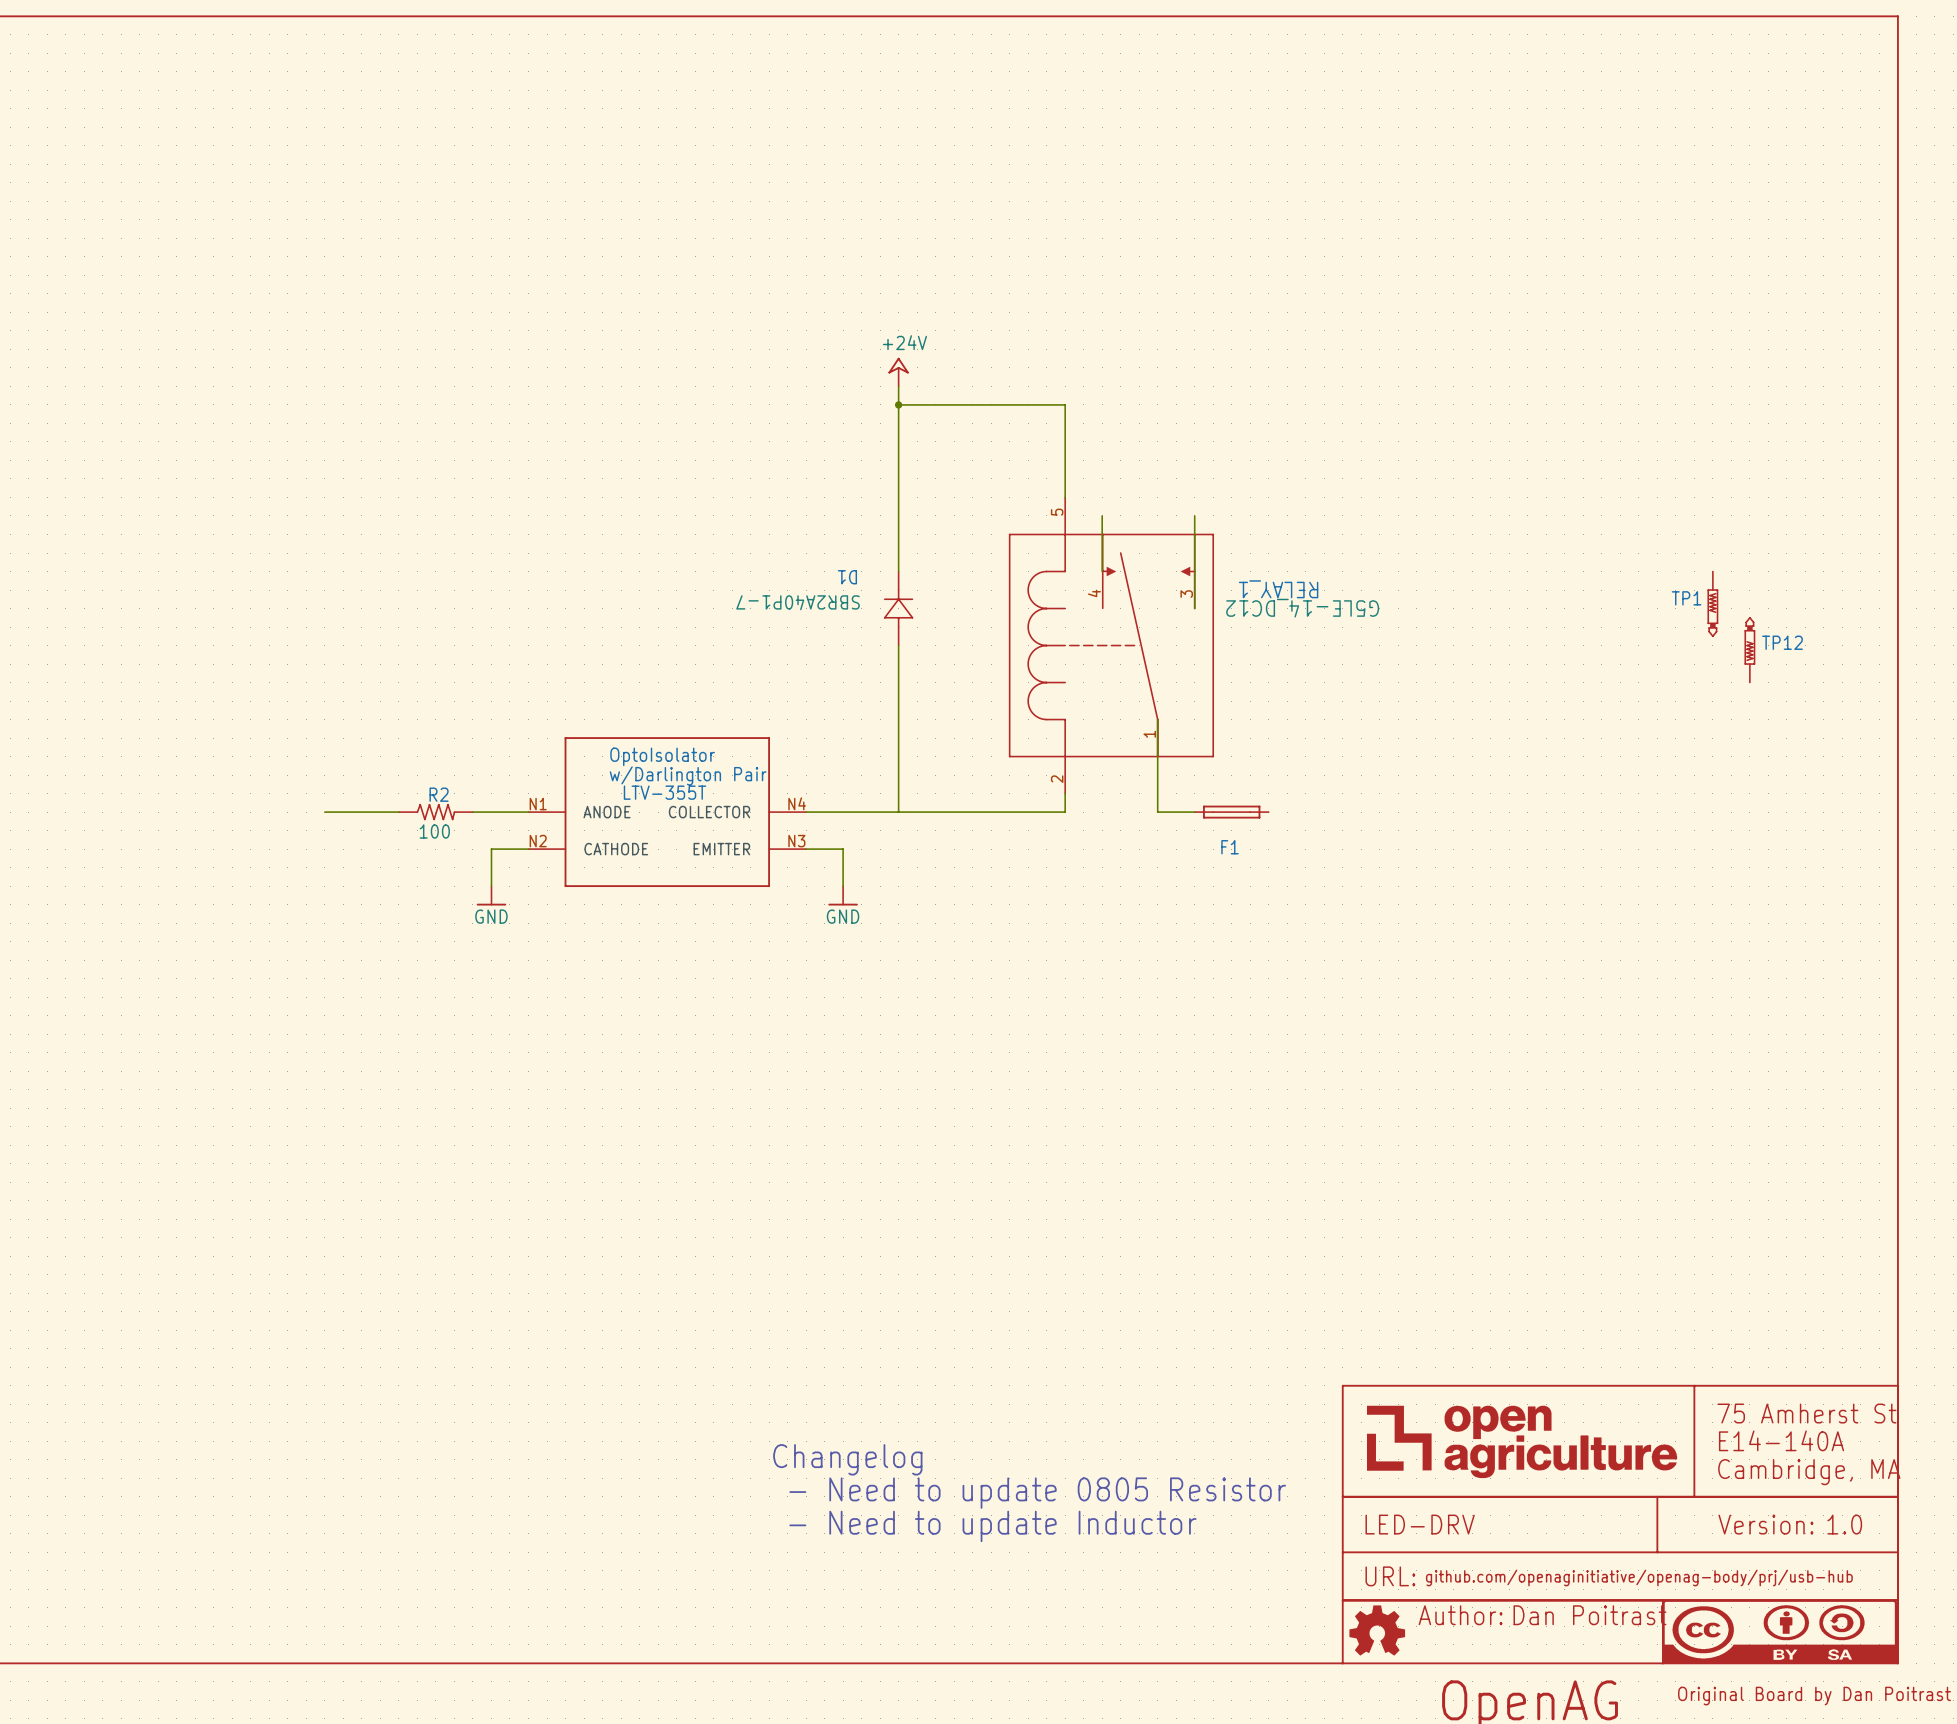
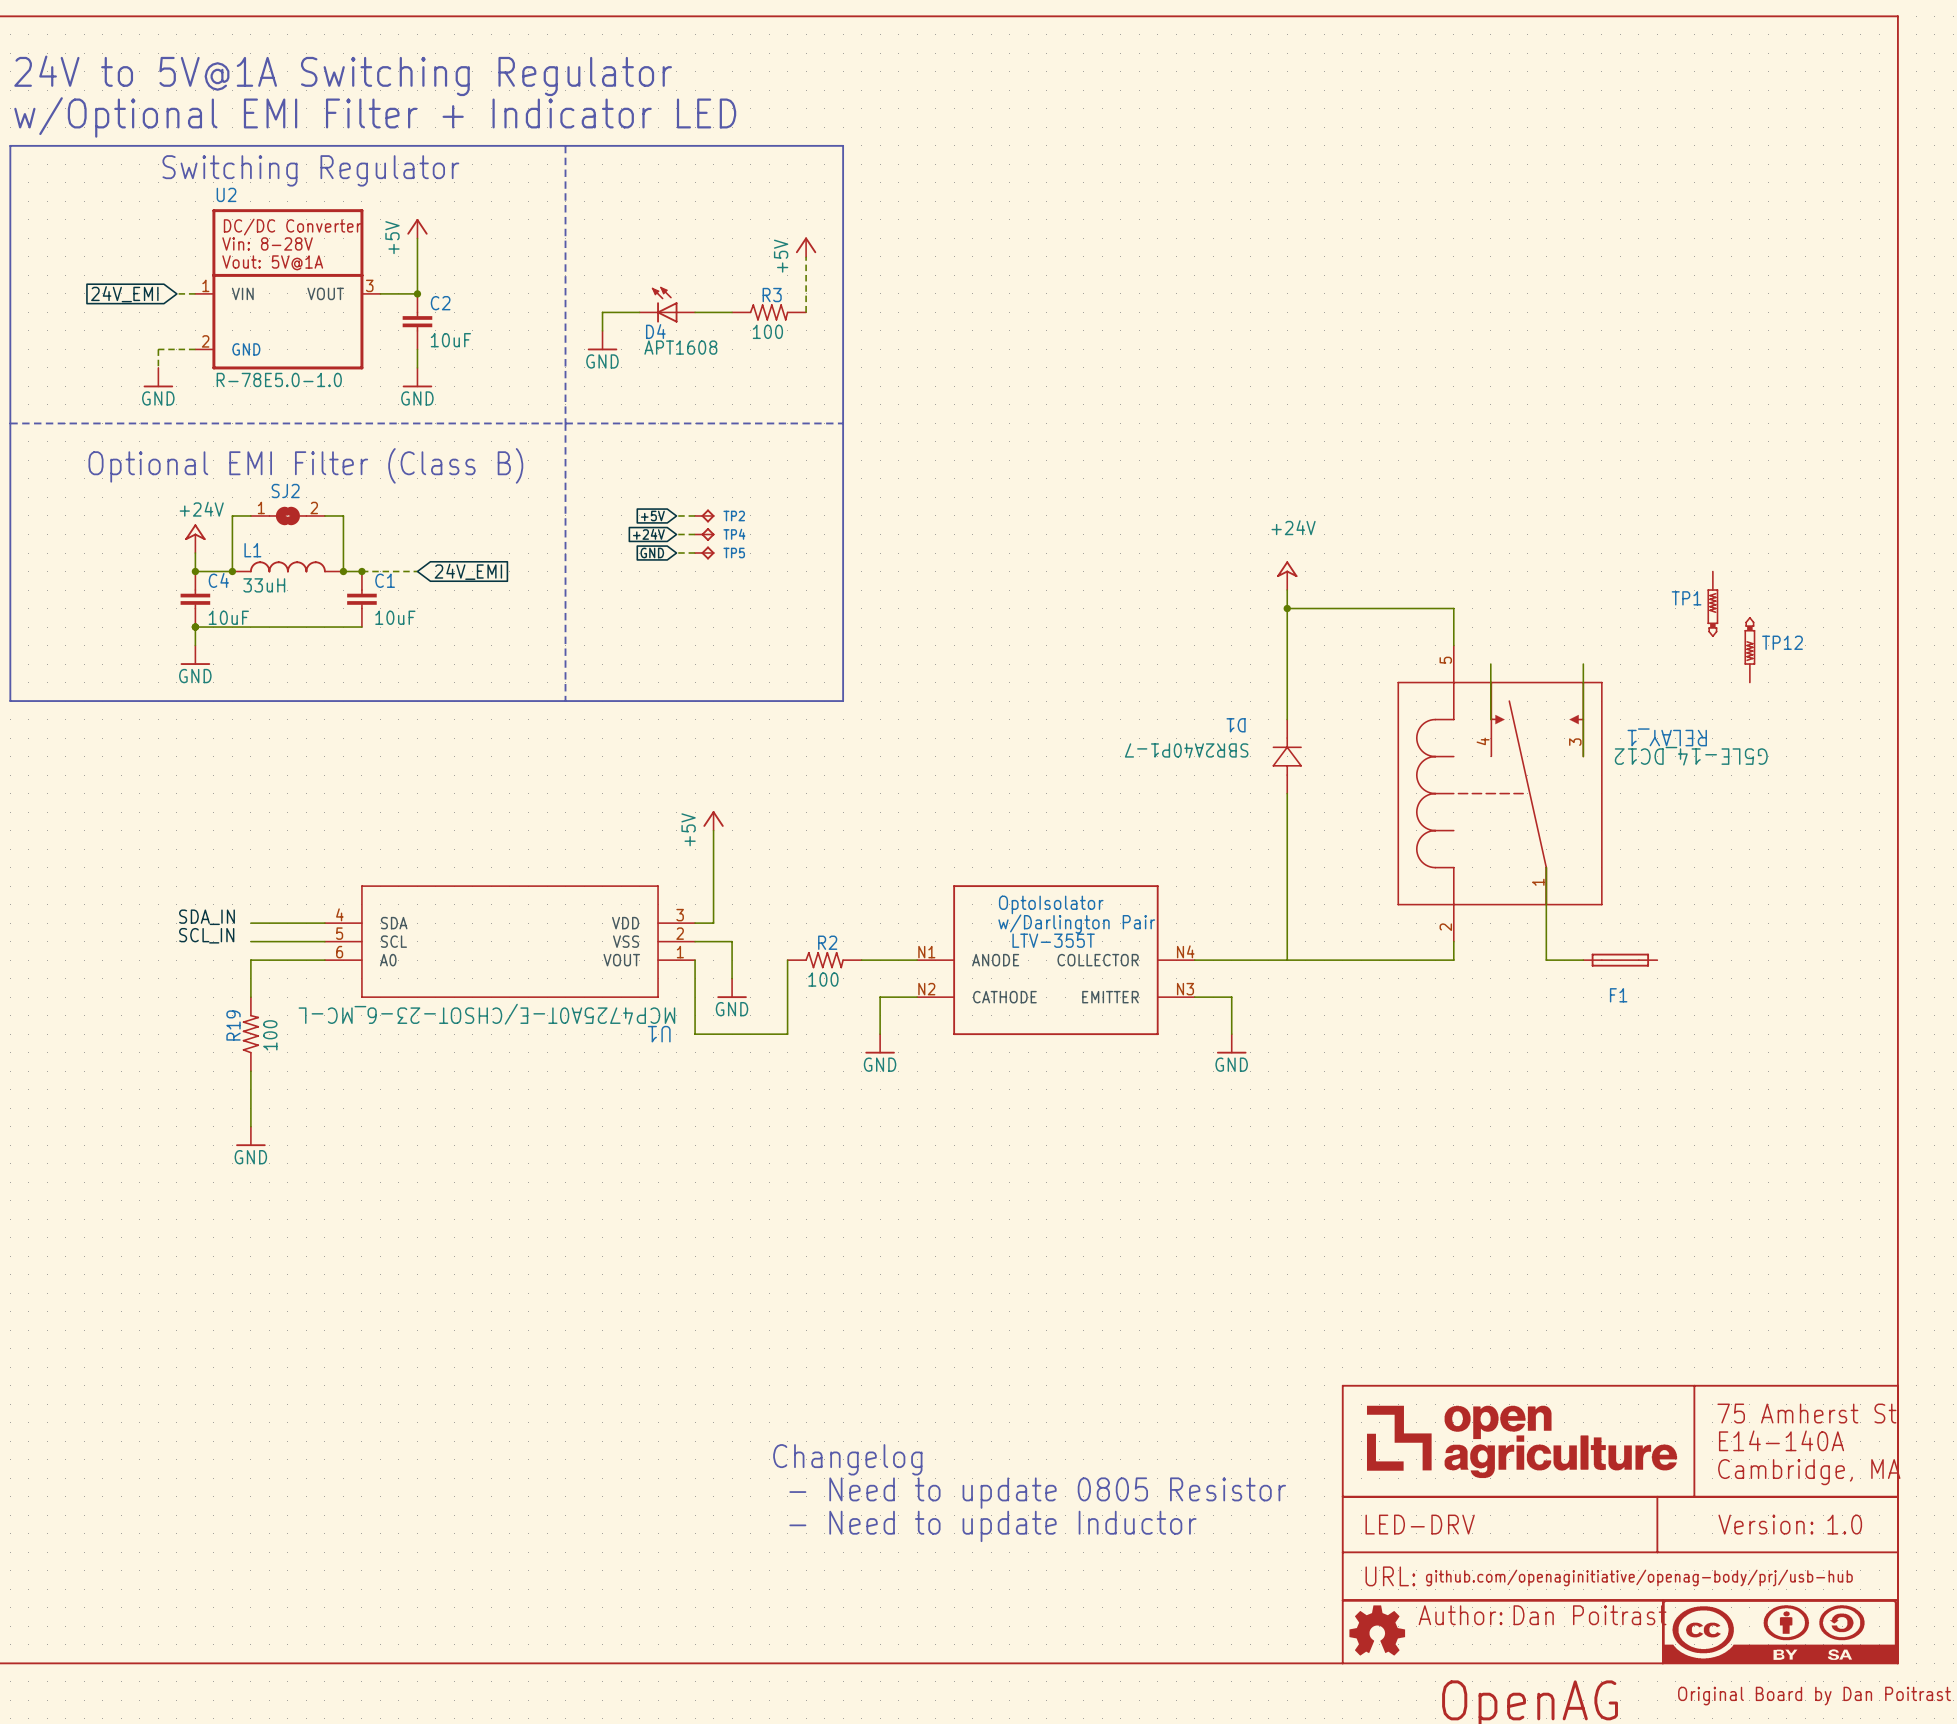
text: none -> 24V to 5V@1A Switching Regulator (343, 75)
text: none -> w/Optional EMI Filter + Indicator LED (375, 117)
line: none -> (10, 145) (843, 145) (843, 701) (10, 701) (10, 145)
line: none -> (565, 145) (565, 701)
text: none -> Switching Regulator (310, 170)
power symbol: none -> +5V (417, 228)
wire: none -> (417, 238) (417, 293) (380, 293)
power symbol: none -> +5V (806, 247)
wire: none -> (806, 256) (806, 312)
U2: none -> R-78E5.0-1.0 (287, 289)
wire: none -> (176, 293) (195, 293)
junction: none -> (417, 293)
global label: none -> 24V_EMI (124, 294)
D4: none -> APT1608 (667, 304)
wire: none -> (639, 312) (602, 312) (602, 330)
wire: none -> (695, 312) (732, 312)
R3: none -> 100 (769, 312)
C2: none -> 10uF (417, 321)
power symbol: none -> GND (602, 340)
wire: none -> (195, 349) (158, 349) (158, 367)
wire: none -> (417, 349) (417, 367)
power symbol: +24V (898, 372) -> none
power symbol: none -> GND (158, 377)
power symbol: none -> GND (417, 377)
wire: (898, 386) (898, 571) -> none
wire: (898, 404) (1065, 404) (1065, 497) -> none
junction: (898, 404) -> none
line: none -> (10, 423) (843, 423)
text: none -> Optional EMI Filter (Class B) (305, 465)
wire: none -> (250, 515) (232, 515) (232, 571) (195, 571) (195, 553)
SJ2: none -> (287, 515)
wire: none -> (324, 515) (343, 515) (343, 571) (417, 571)
global label: none -> +5V (652, 515)
wire: none -> (676, 515) (695, 515)
TP2: none -> (704, 515)
wire: (1102, 515) (1102, 571) -> none
wire: (1194, 515) (1194, 608) -> none
global label: none -> +24V (648, 534)
wire: none -> (676, 534) (695, 534)
TP4: none -> (704, 534)
power symbol: none -> +24V (195, 538)
global label: none -> GND (652, 553)
wire: none -> (676, 553) (695, 553)
TP5: none -> (704, 553)
L1: none -> 33uH (287, 566)
junction: none -> (195, 571)
junction: none -> (232, 571)
junction: none -> (343, 571)
junction: none -> (361, 571)
global label: none -> 24V_EMI (468, 571)
power symbol: none -> +24V (1287, 575)
wire: none -> (1287, 590) (1287, 719)
C4: none -> 10uF (195, 599)
C1: none -> 10uF (361, 599)
D1 position: (898, 608) -> (1287, 756)
wire: none -> (1287, 608) (1453, 608) (1453, 645)
junction: none -> (1287, 608)
junction: none -> (195, 627)
wire: none -> (361, 627) (195, 627) (195, 645)
wire: (898, 645) (898, 812) -> none
RELAY_1 position: (1111, 645) -> (1500, 793)
power symbol: none -> GND (195, 655)
wire: none -> (1490, 664) (1490, 719)
wire: none -> (1583, 664) (1583, 756)
wire: (1157, 719) (1157, 812) (1194, 812) -> none
text: LTV-355T (665, 792) -> none
wire: (1065, 793) (1065, 812) (806, 812) -> none
wire: none -> (1287, 793) (1287, 960)
wire: (324, 812) (398, 812) -> (250, 923) (324, 923)
R2 position: (435, 812) -> (824, 960)
wire: (472, 812) (528, 812) -> none
part: (667, 812) -> none
F1 position: (1231, 812) -> (1620, 960)
power symbol: none -> +5V (713, 820)
wire: none -> (713, 830) (713, 923) (695, 923)
wire: (528, 849) (491, 849) (491, 886) -> none
wire: (806, 849) (843, 849) (843, 886) -> (695, 941) (732, 941) (732, 978)
wire: none -> (1546, 867) (1546, 960) (1583, 960)
power symbol: GND (491, 895) -> none
power symbol: GND (843, 895) -> none
label: none -> SDA_IN (206, 917)
label: none -> SCL_IN (206, 935)
text: none -> LTV-355T (1053, 940)
wire: none -> (250, 941) (324, 941)
U1: none -> MCP4725A0T-E/CHSOT-23-6_MC-L (509, 941)
wire: none -> (1453, 941) (1453, 960) (1194, 960)
wire: none -> (324, 960) (250, 960) (250, 997)
wire: none -> (695, 960) (695, 1034) (787, 1034) (787, 960)
wire: none -> (861, 960) (917, 960)
part: none -> (1055, 960)
power symbol: none -> GND (732, 988)
wire: none -> (917, 997) (880, 997) (880, 1034)
wire: none -> (1194, 997) (1231, 997) (1231, 1034)
R19: none -> 100 (250, 1034)
power symbol: none -> GND (880, 1043)
power symbol: none -> GND (1231, 1043)
wire: none -> (250, 1071) (250, 1126)
power symbol: none -> GND (250, 1136)

